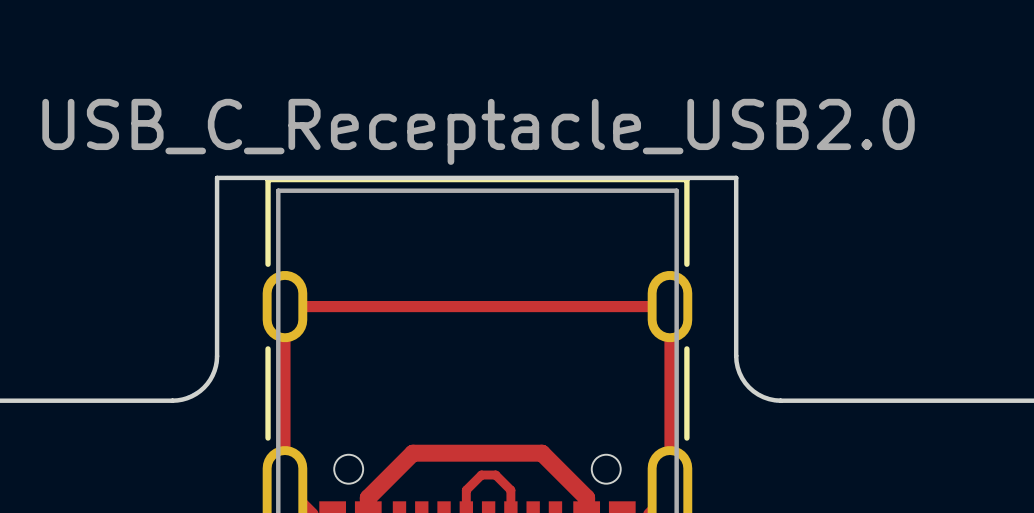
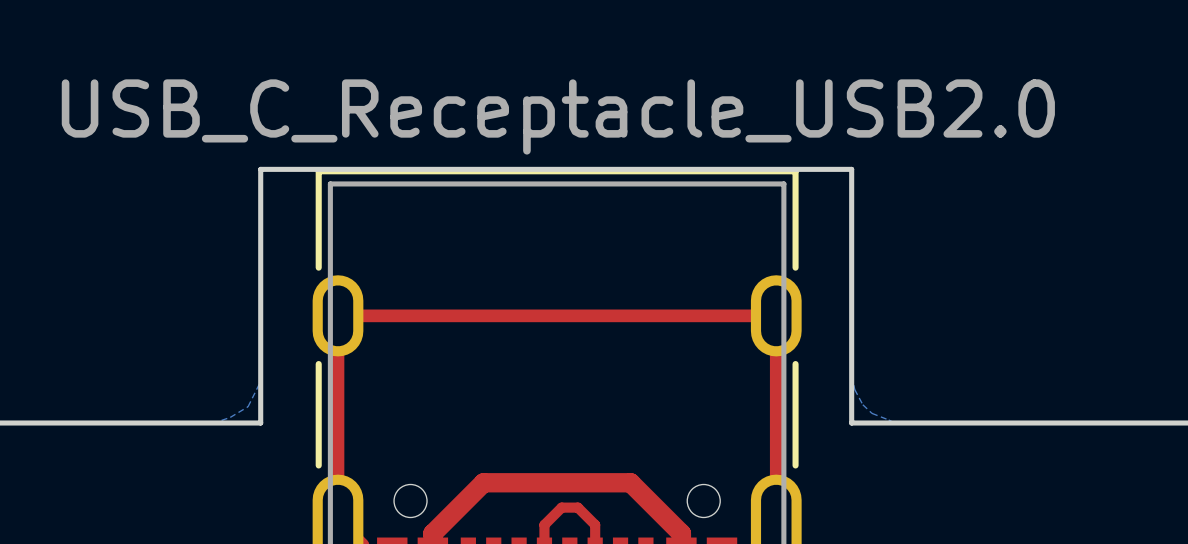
board edge: (736, 355) (739, 372) (749, 387) (763, 397) (780, 400) -> (851, 371) (851, 423) (902, 423)
board edge: (217, 356) (212, 375) (204, 387) (187, 398) (172, 400) -> (260, 372) (260, 423) (209, 423)

